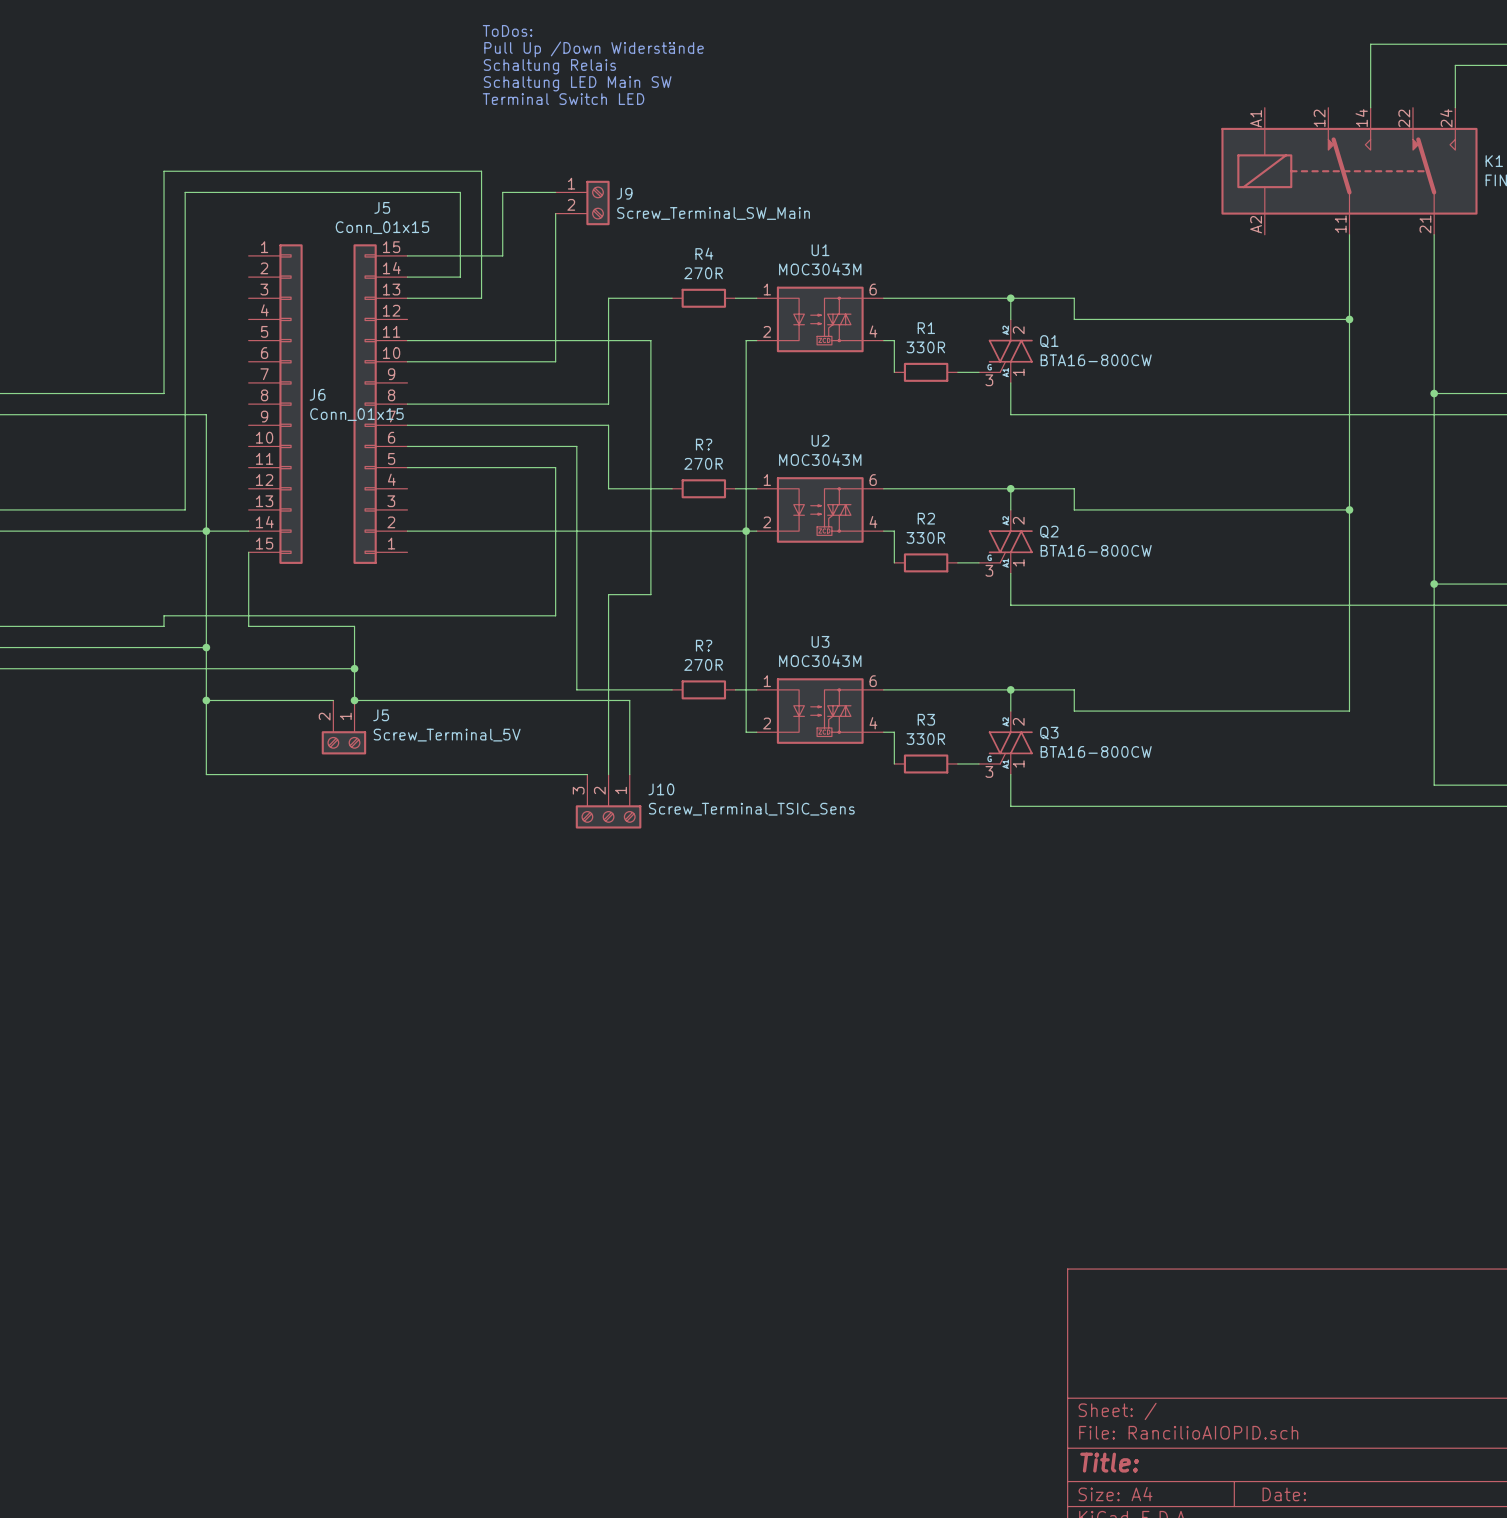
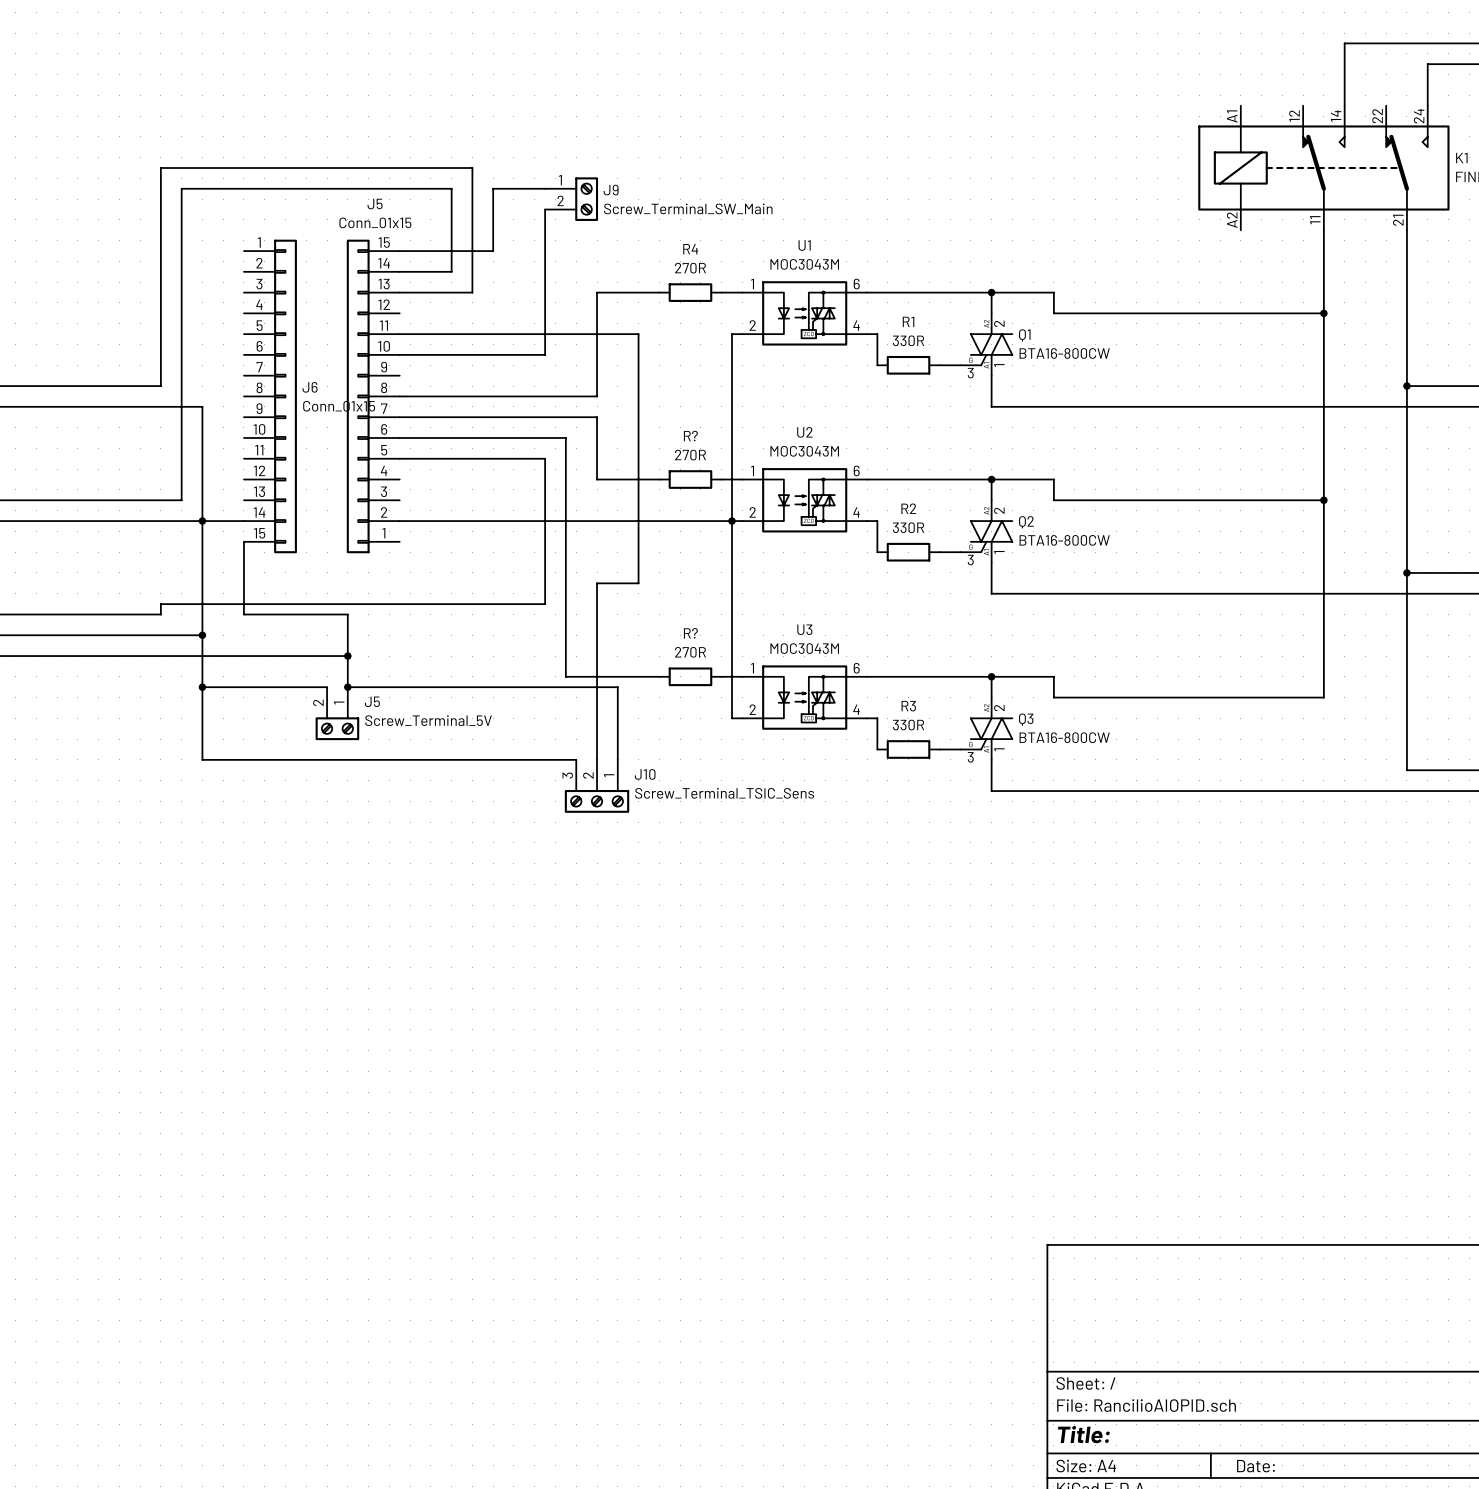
text: ToDos: (507, 30) -> none
text: Pull Up /Down Widerstände (594, 49) -> none
text: Schaltung Relais (549, 66) -> none
text: Schaltung LED Main SW (577, 83) -> none
text: Terminal Switch LED (563, 99) -> none

